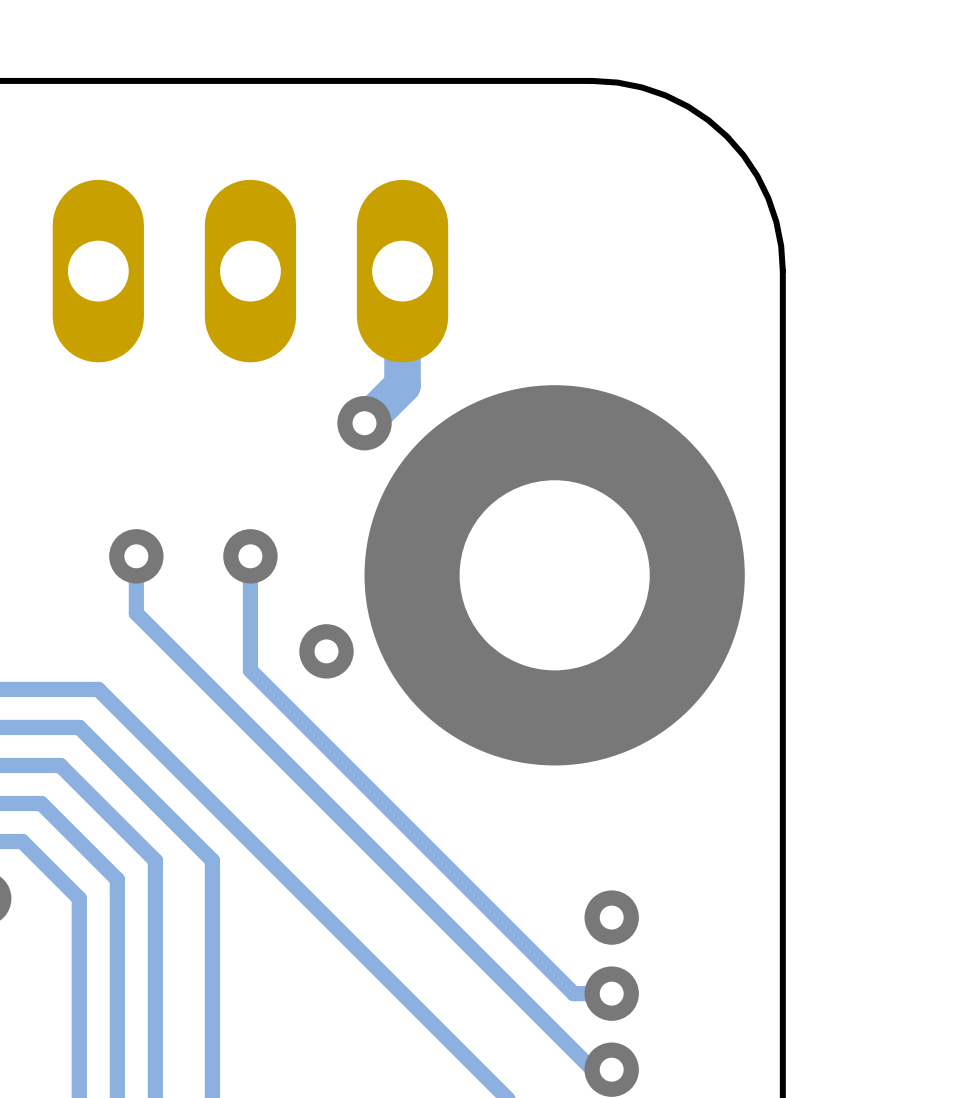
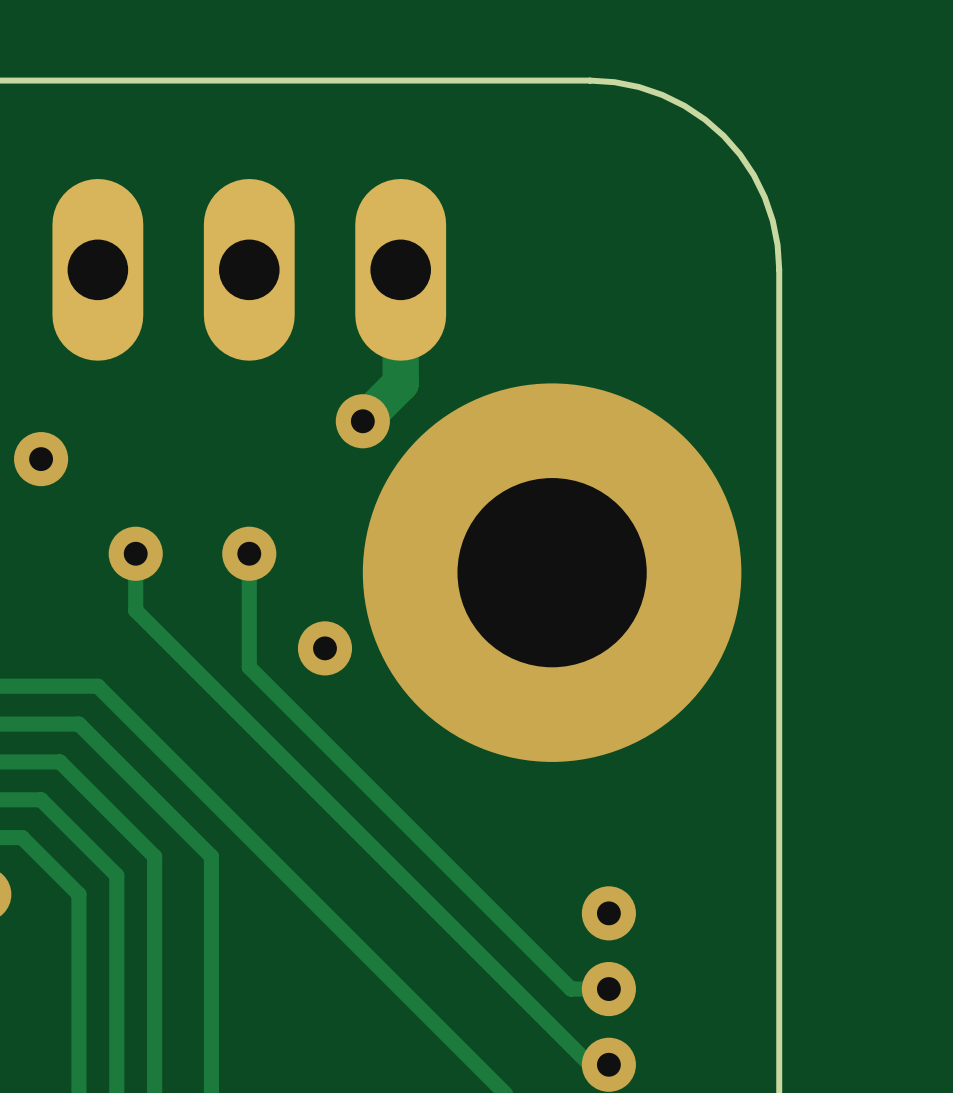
via: none -> (41, 459)

